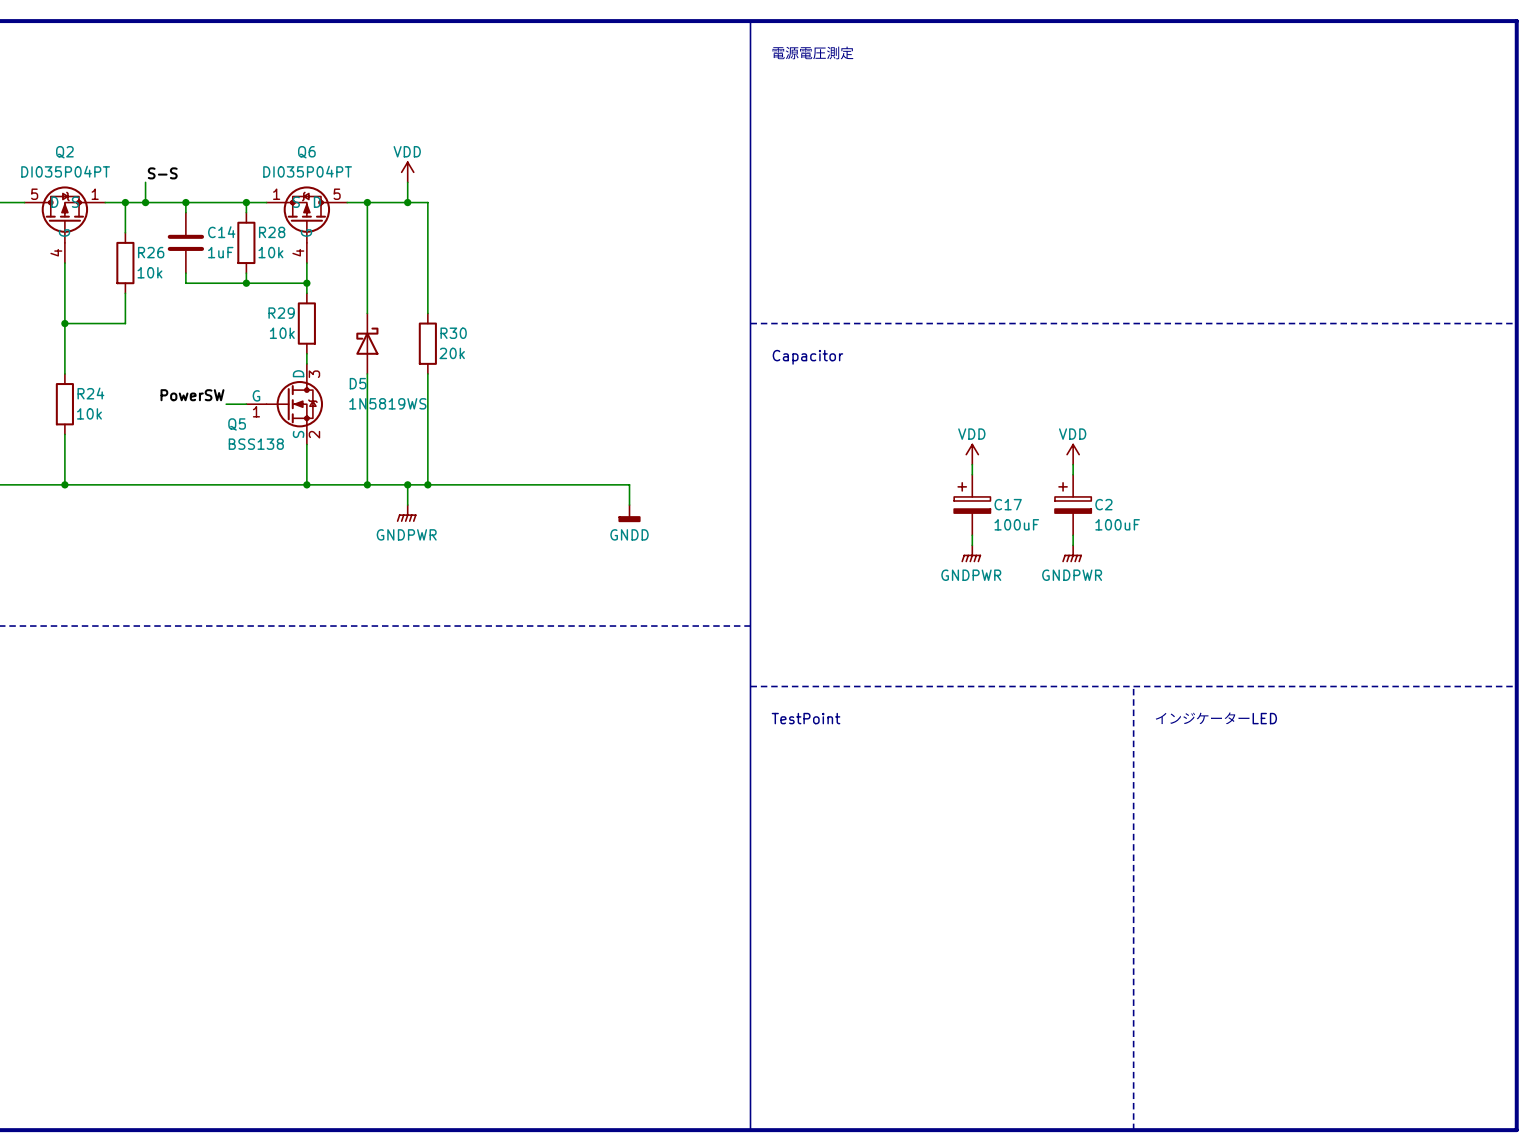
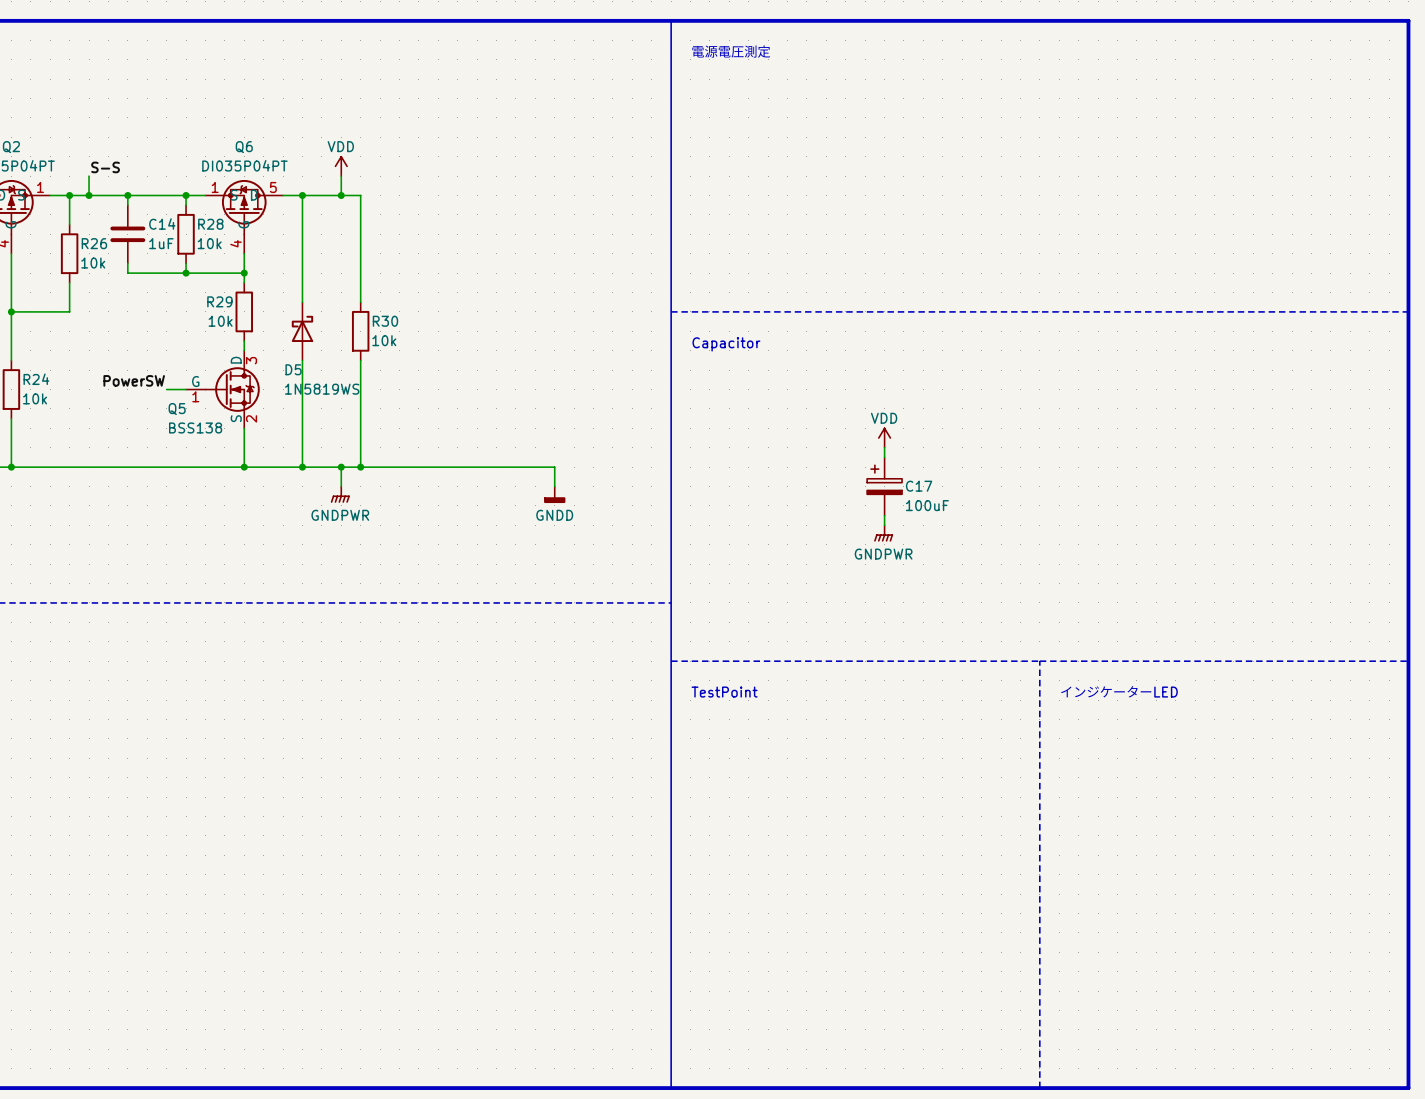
R30 value: 20k (452, 353) -> 10k (384, 340)
power symbol: VDD (1073, 454) -> none
wire: (1073, 464) (1073, 474) -> none
C2: 100uF (1073, 505) -> none
wire: (1073, 535) (1073, 545) -> none
power symbol: GNDPWR (1072, 553) -> none

